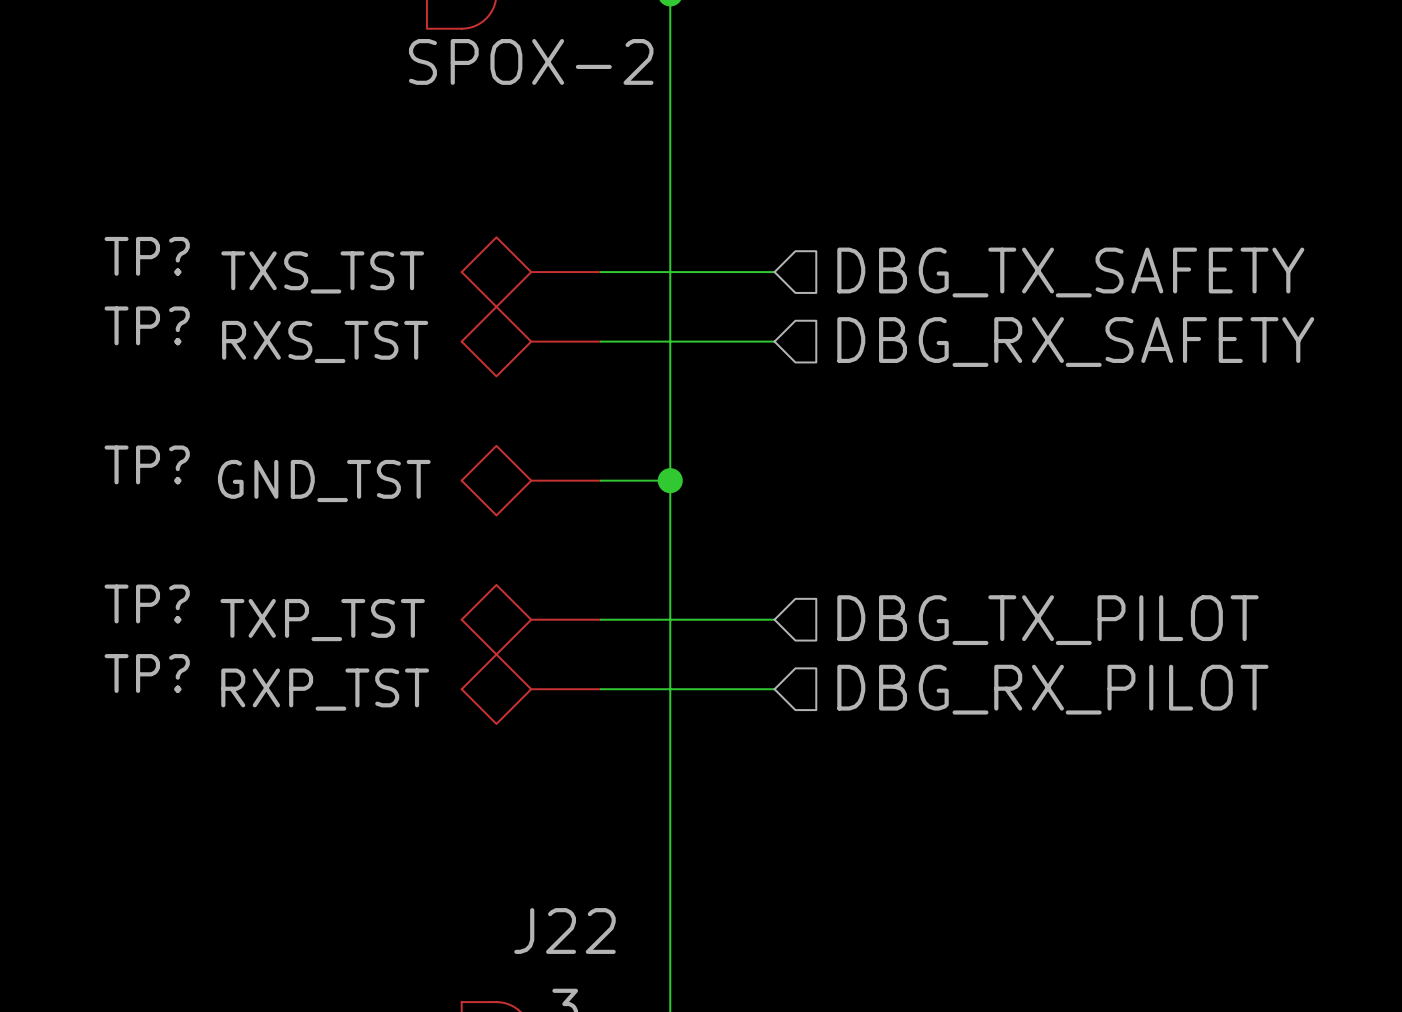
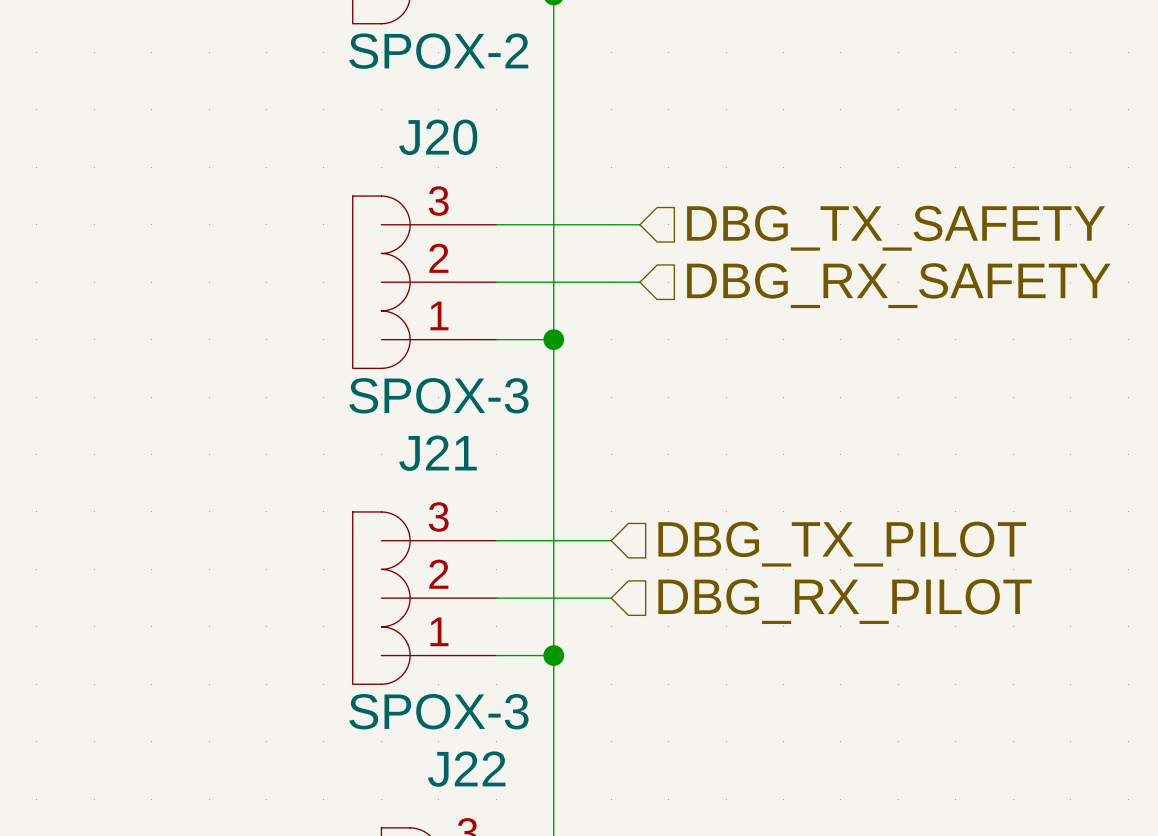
TP?: TXS_TST (531, 272) -> none
J20: none -> SPOX-3 (424, 282)
TP?: RXS_TST (531, 341) -> none
TP?: GND_TST (531, 480) -> none
wire: (600, 480) (670, 480) -> (496, 339) (553, 339)
junction position: (670, 480) -> (553, 339)
TP?: TXP_TST (531, 619) -> none
wire: (600, 619) (774, 619) -> none
hierarchical label position: DBG_TX_PILOT (1047, 620) -> DBG_TX_PILOT (842, 544)
wire: none -> (496, 540) (611, 540)
TP?: RXP_TST (531, 689) -> none
wire: (600, 689) (774, 689) -> none
hierarchical label position: DBG_RX_PILOT (1052, 689) -> DBG_RX_PILOT (845, 601)
J21: none -> SPOX-3 (424, 598)
wire: none -> (496, 598) (611, 598)
wire: none -> (496, 655) (553, 655)
junction: none -> (553, 655)

